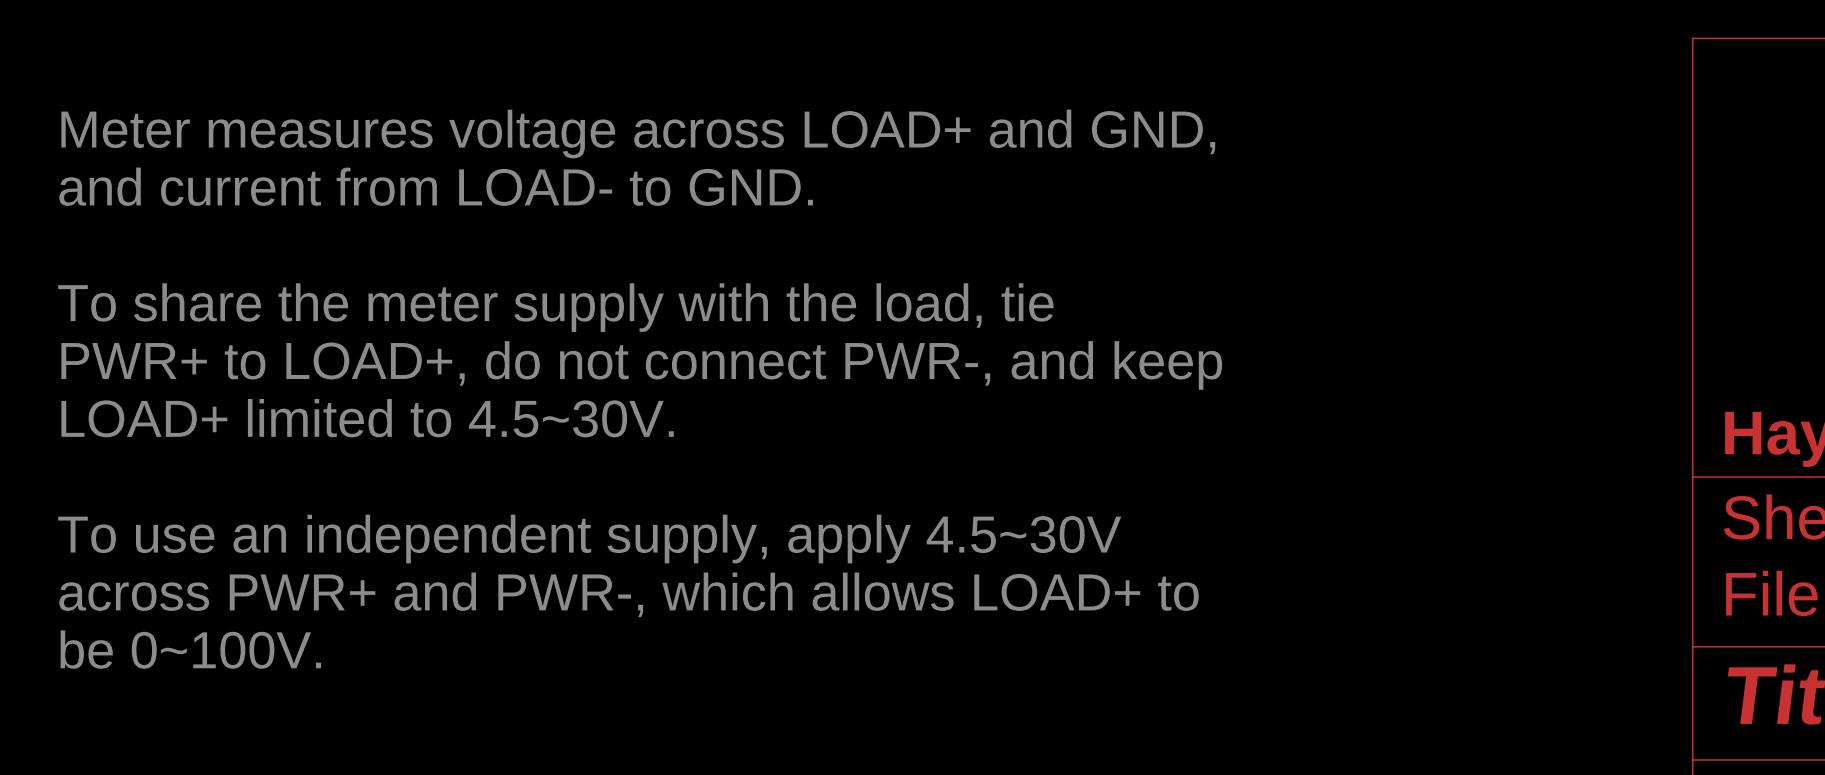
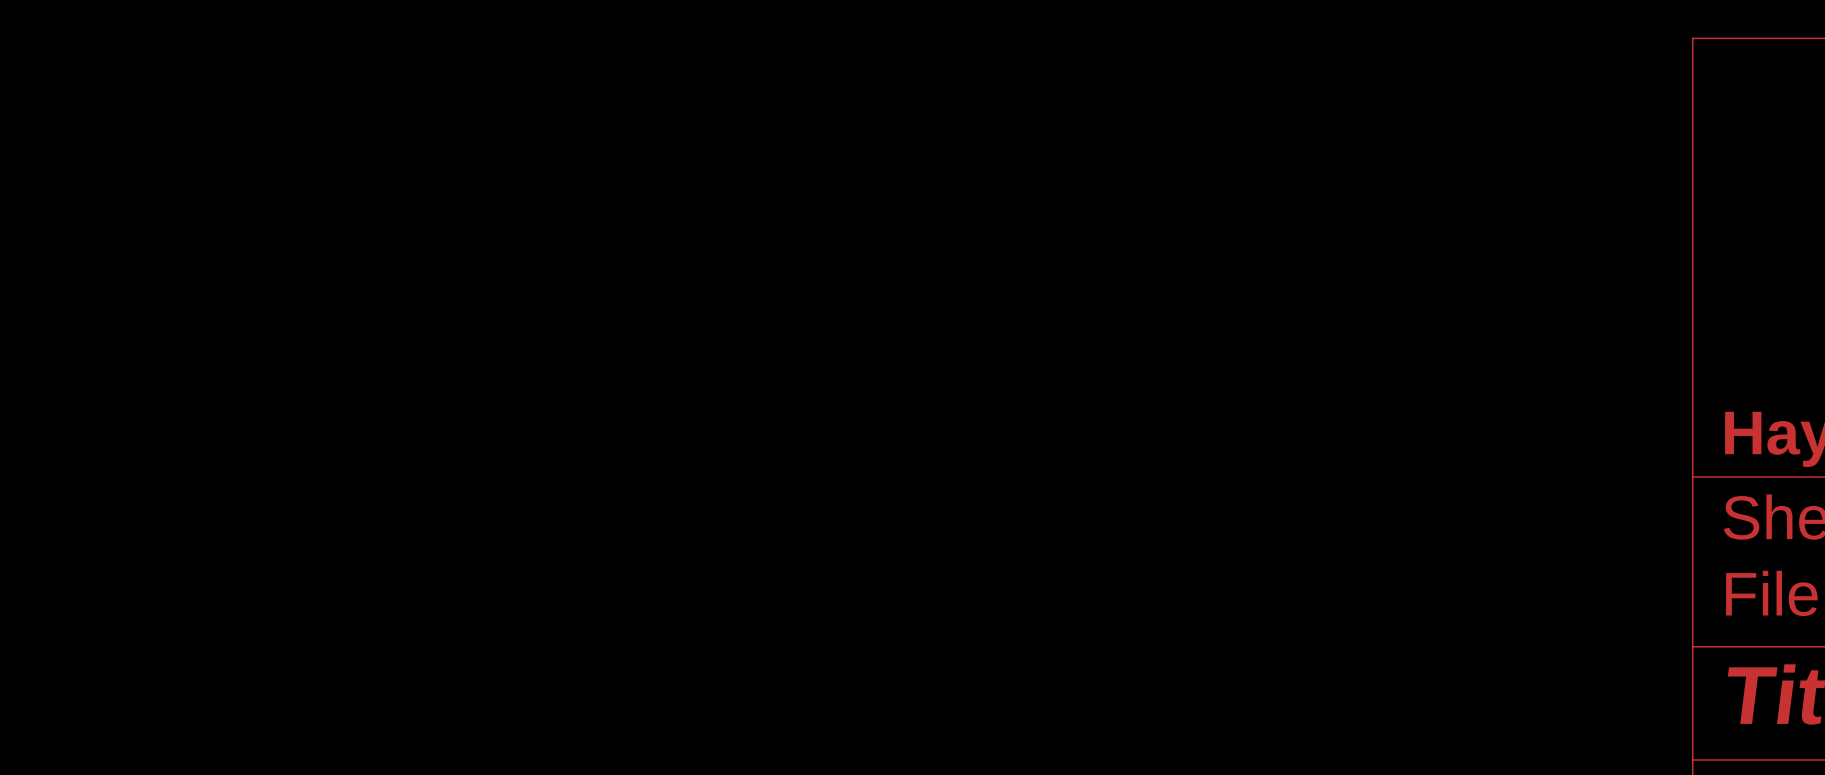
text: Meter measures voltage across LOAD+ and GND, (638, 134) -> none
text: and current from LOAD- to GND. (436, 186) -> none
text: To share the meter supply with the load, tie (555, 307) -> none
text: PWR+ to LOAD+, do not connect PWR-, and keep (641, 365) -> none
text: LOAD+ limited to 4.5~30V. (367, 418) -> none
text: To use an independent supply, apply 4.5~30V (589, 539) -> none
text: across PWR+ and PWR-, which allows LOAD+ to (629, 594) -> none
text: be 0~100V. (190, 649) -> none

